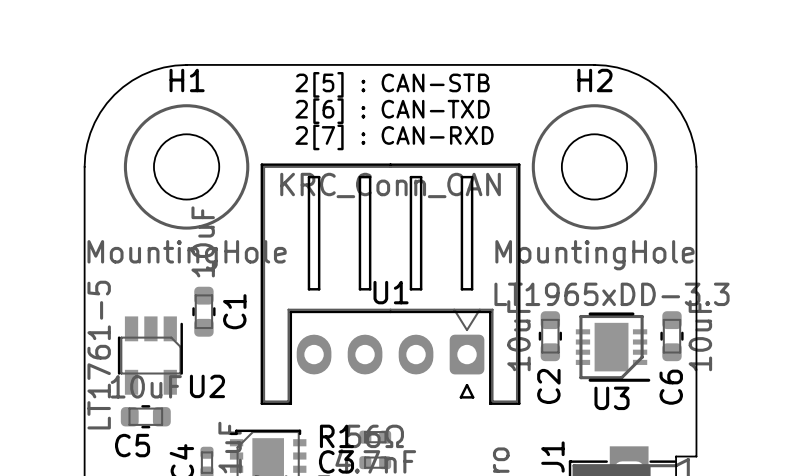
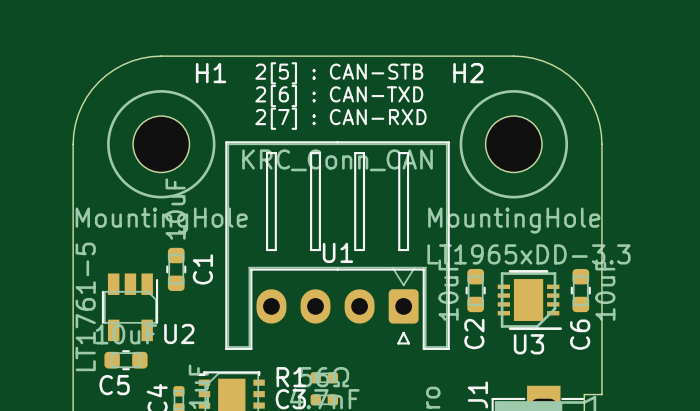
H1 name position: H1 (187, 80) -> H1 (211, 73)
H2 name position: H2 (594, 80) -> H2 (468, 73)

